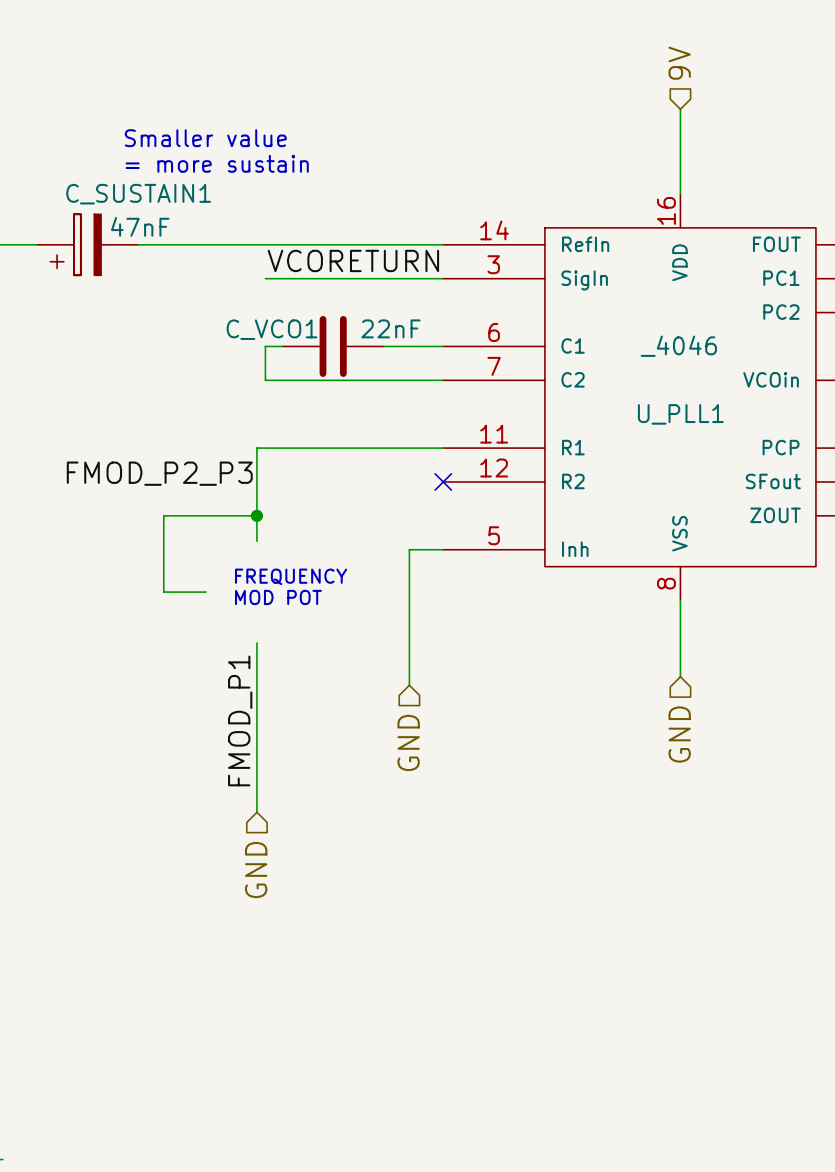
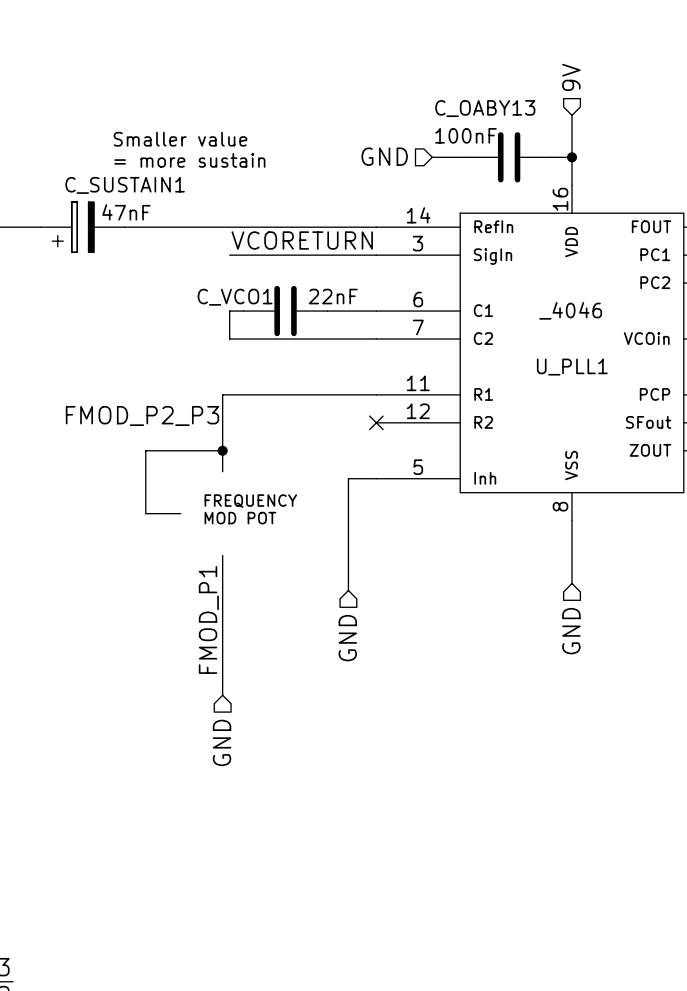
hierarchical label: none -> GND (384, 156)
wire: none -> (432, 157) (467, 157)
C_OABY13: none -> 100nF (509, 157)
wire: none -> (551, 157) (572, 157)
junction: none -> (572, 157)

